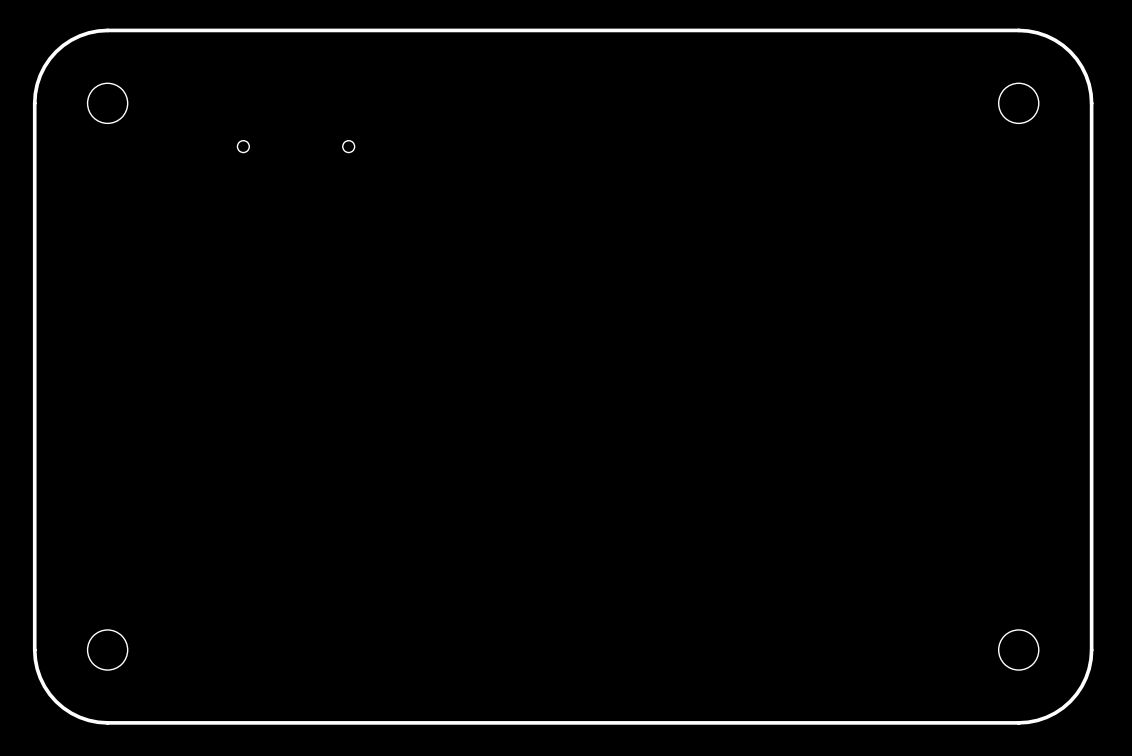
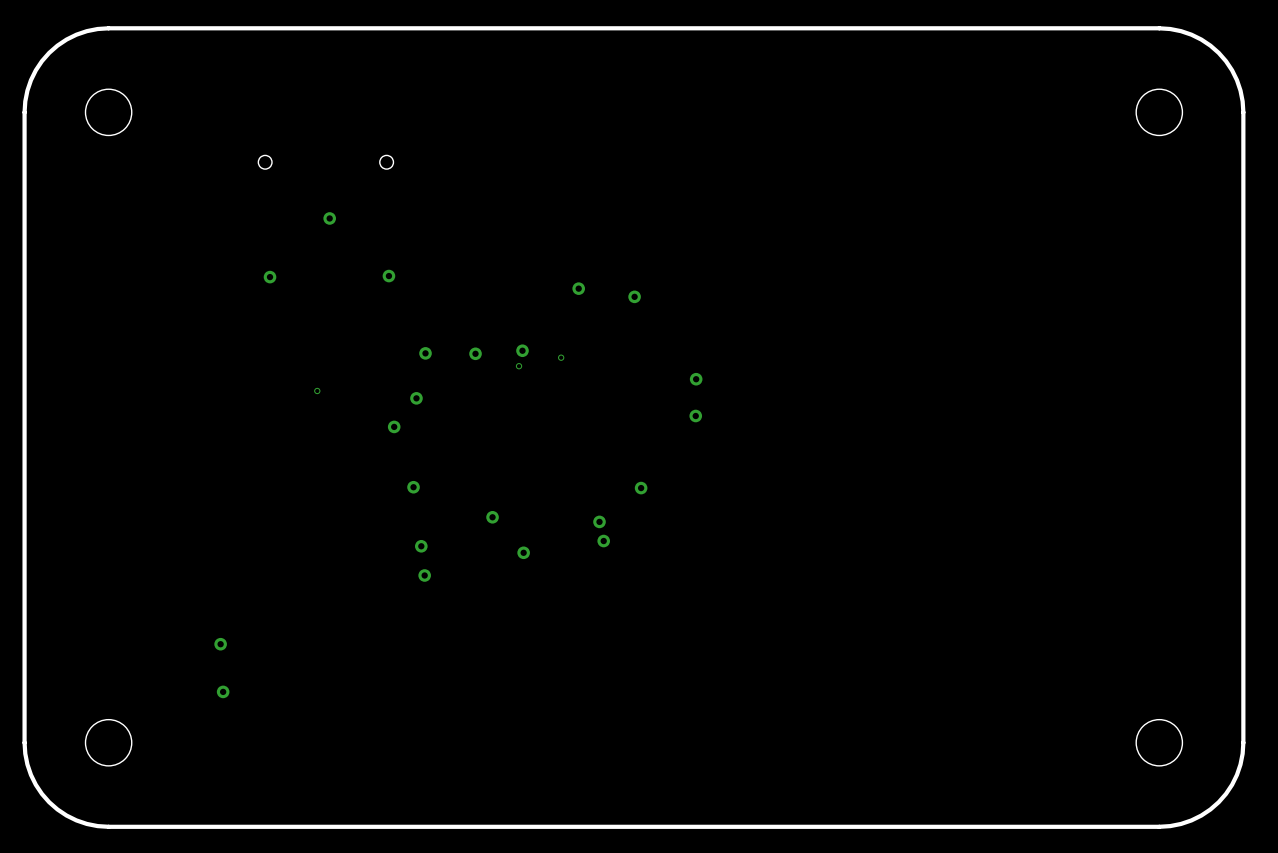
via: none -> (329, 218)
via: none -> (388, 276)
via: none -> (270, 277)
via: none -> (578, 288)
via: none -> (634, 296)
via: none -> (522, 350)
via: none -> (425, 353)
via: none -> (475, 353)
via: none -> (561, 357)
via: none -> (519, 366)
via: none -> (696, 379)
via: none -> (317, 390)
via: none -> (416, 398)
via: none -> (695, 415)
via: none -> (394, 426)
via: none -> (413, 487)
via: none -> (641, 488)
via: none -> (492, 517)
via: none -> (599, 521)
via: none -> (603, 541)
via: none -> (421, 546)
via: none -> (523, 552)
via: none -> (424, 575)
via: none -> (220, 644)
via: none -> (223, 691)

